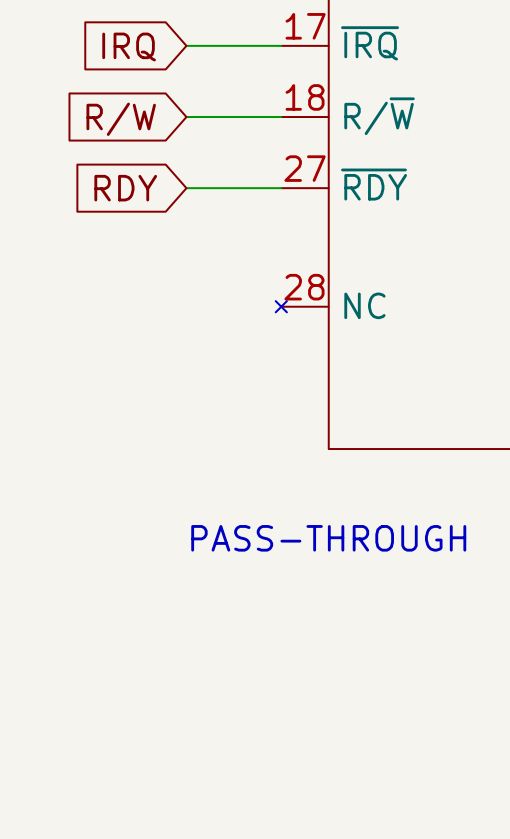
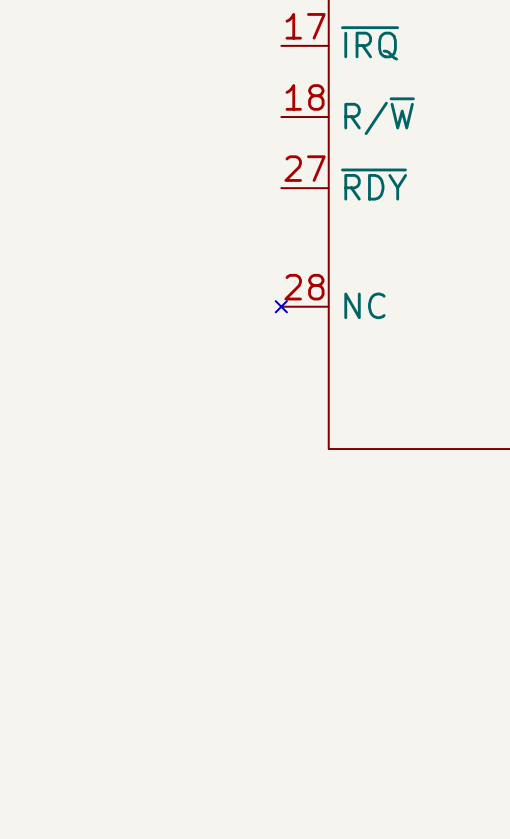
wire: (186, 45) (281, 45) -> none
global label: IRQ (129, 47) -> none
wire: (186, 117) (281, 117) -> none
global label: R/W (121, 119) -> none
global label: RDY (125, 188) -> none
wire: (186, 188) (281, 188) -> none
text: PASS-THROUGH (328, 538) -> none

